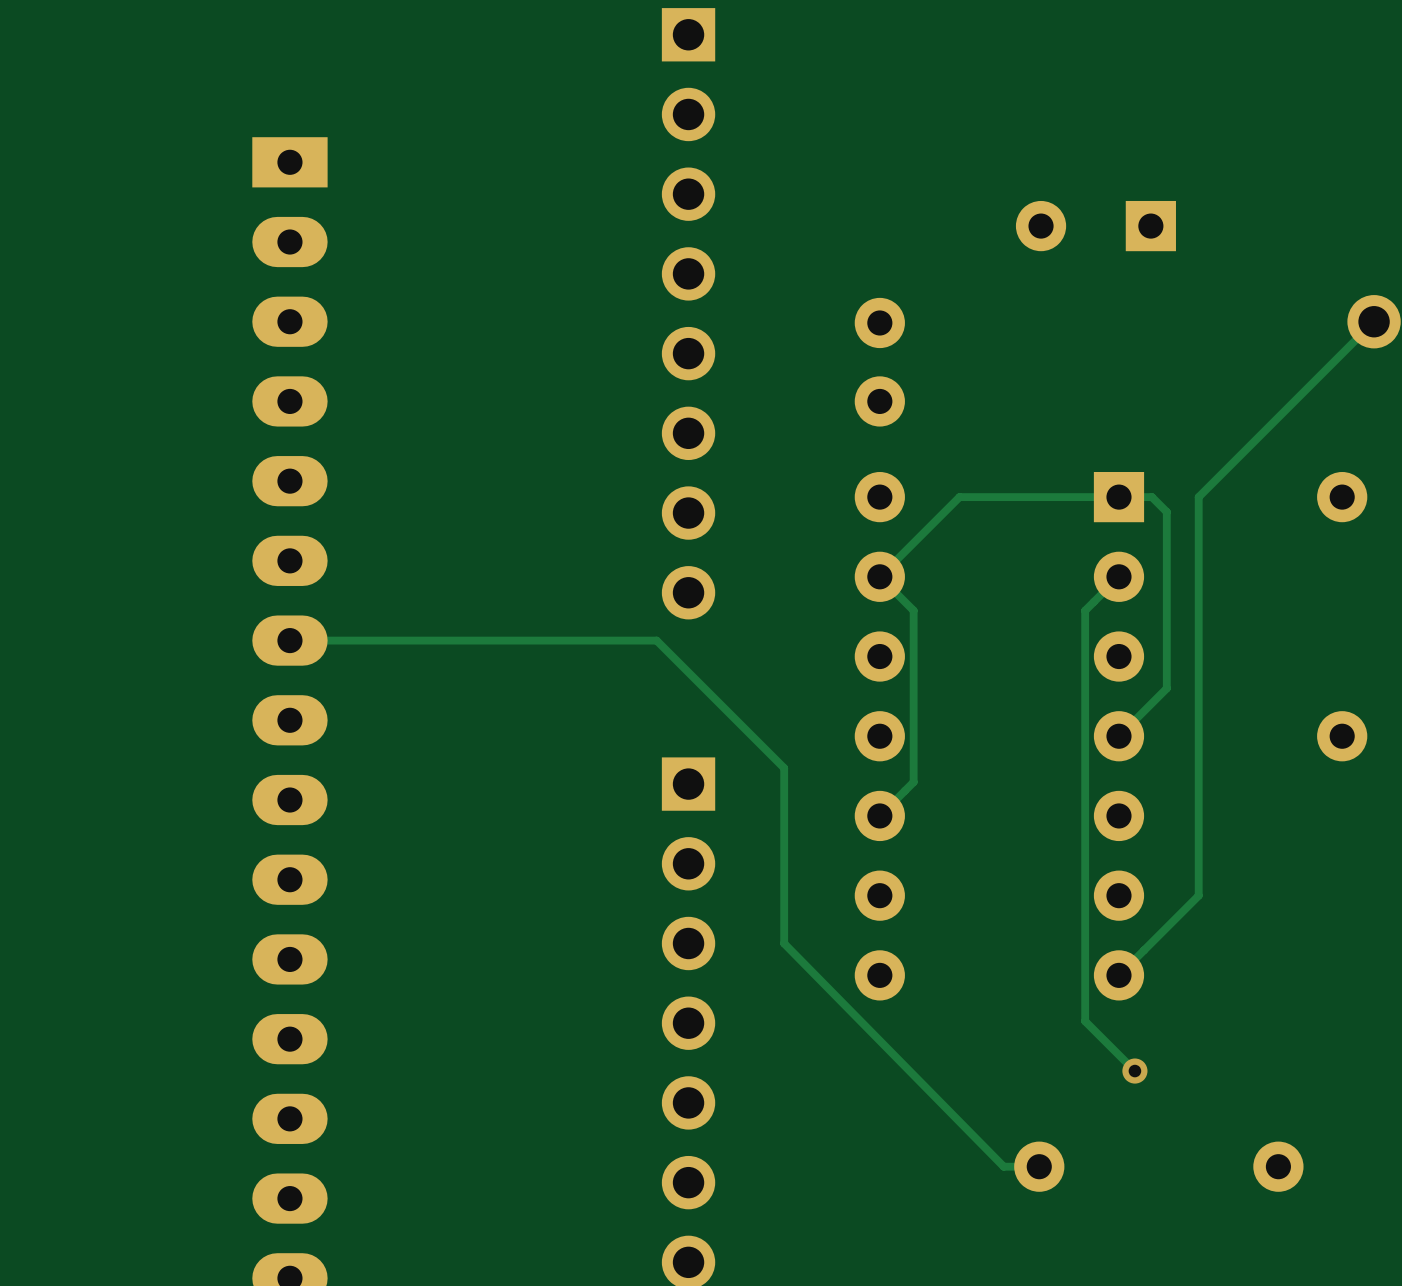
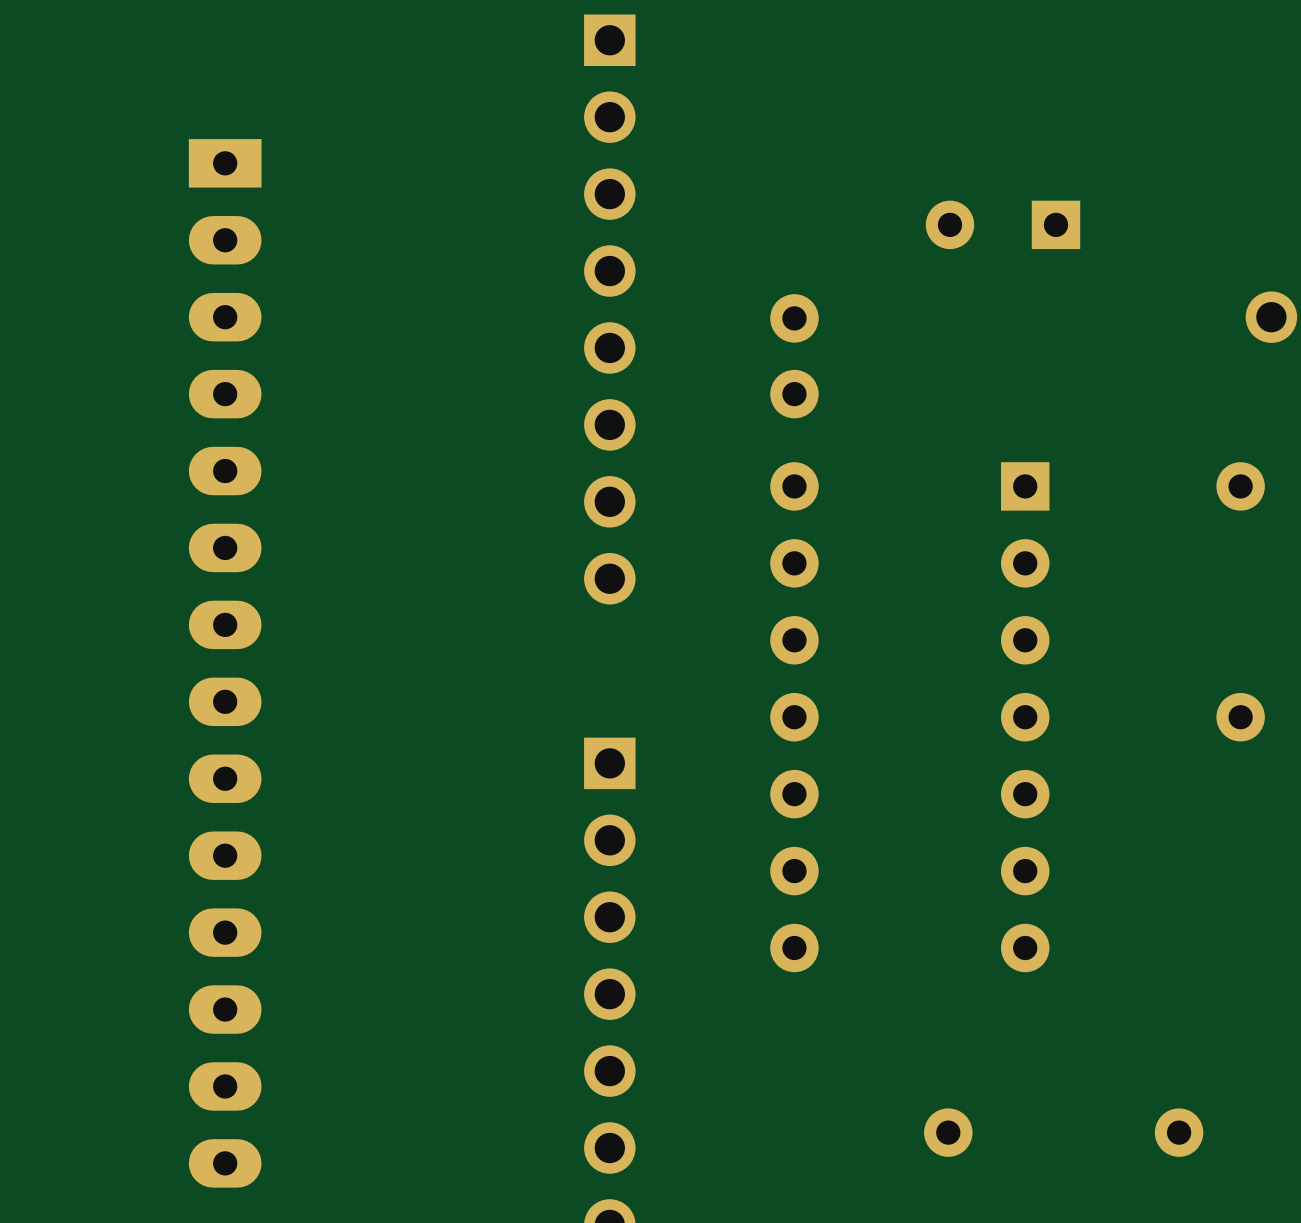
track: (1374, 321) (1198, 497) (1198, 895) (1118, 975) -> none
track: (1118, 576) (1085, 610) (1085, 1021) (1134, 1071) -> none
track: (289, 640) (656, 640) (784, 768) (784, 943) (1003, 1166) (1039, 1166) -> none
track: (1118, 736) (1166, 688) (1166, 511) (1151, 497) (959, 497) (879, 576) (913, 610) (913, 782) (879, 815) -> none
via: (1134, 1071) -> none

